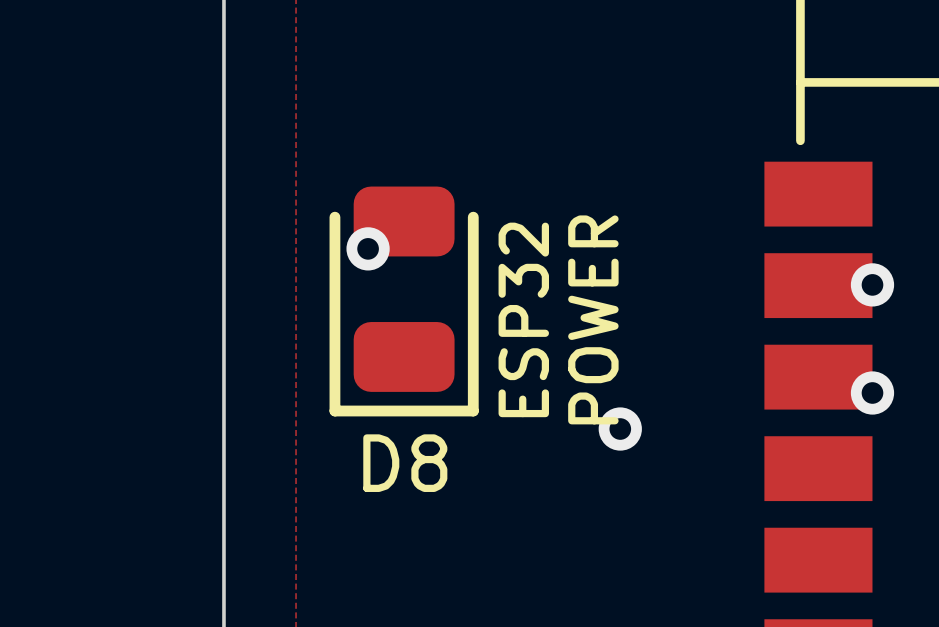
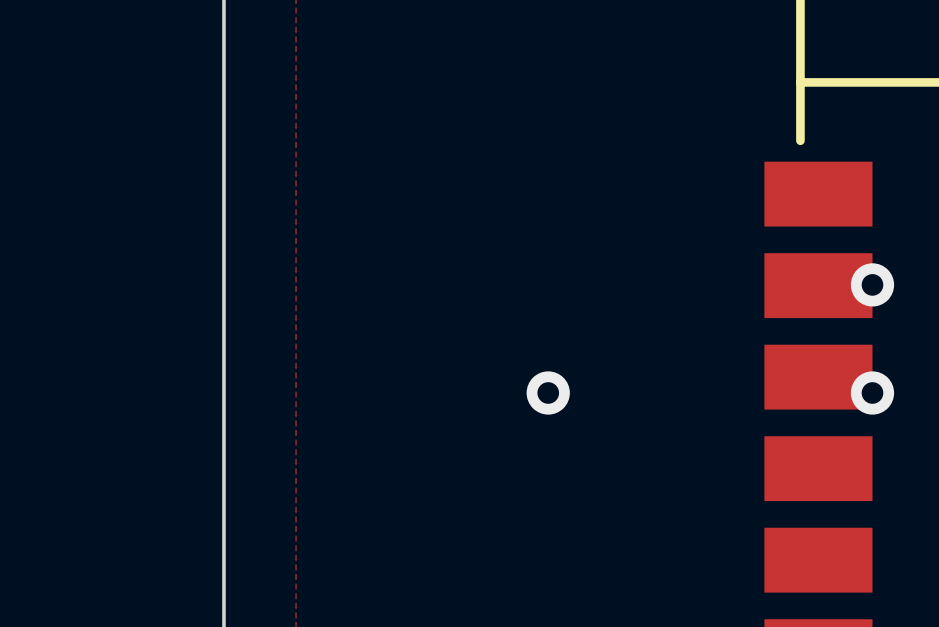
via: (368, 248) -> none
D8: (404, 301) -> none
text: ESP32 (523, 319) -> none
text: POWER (593, 319) -> none
via position: (620, 429) -> (548, 392)

